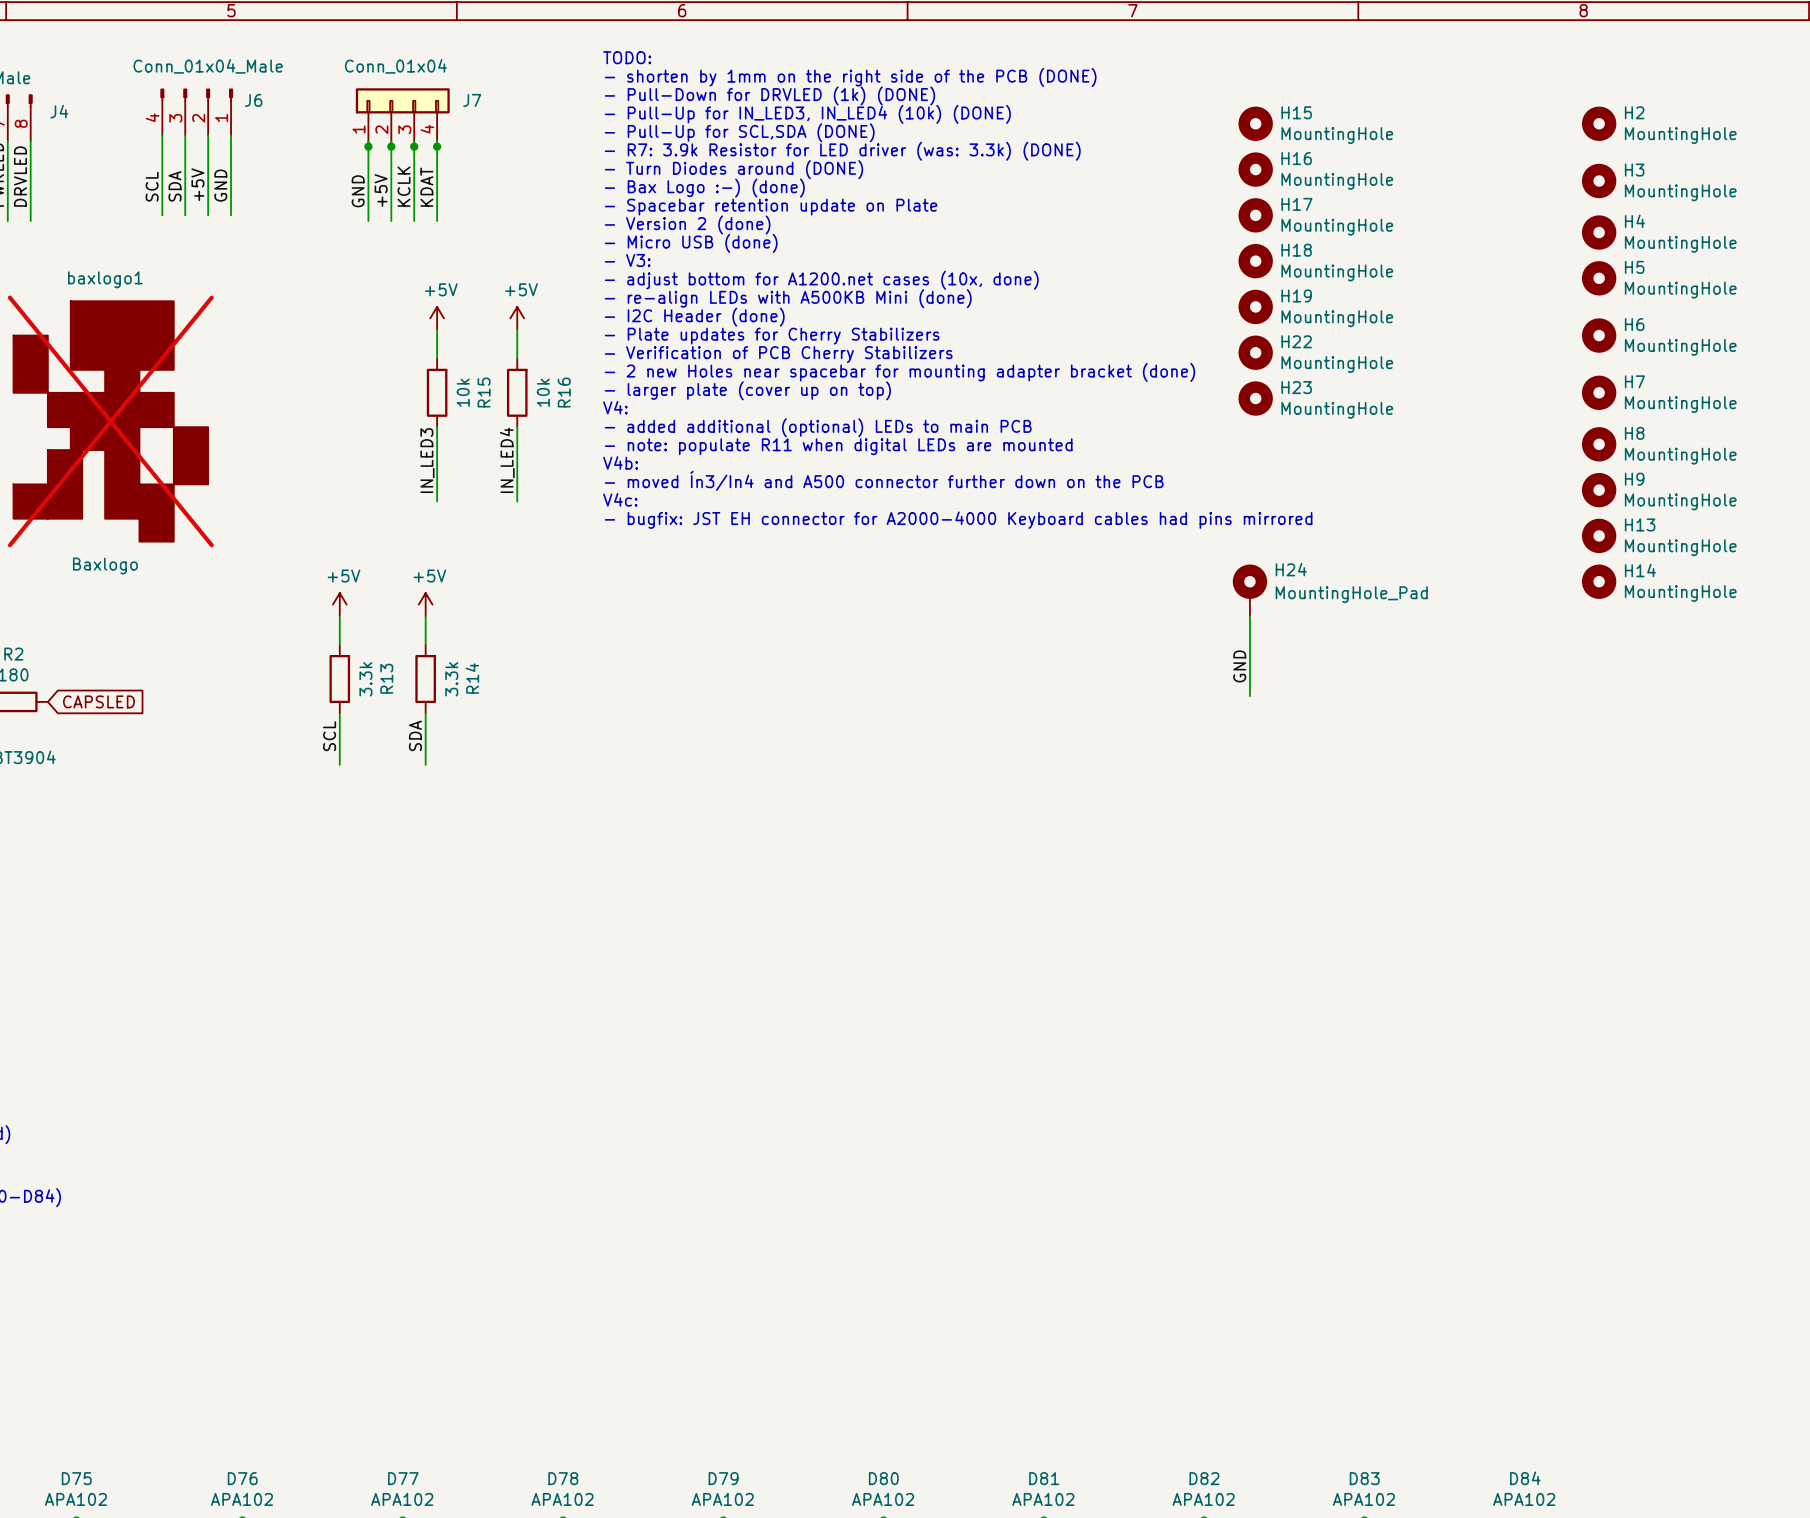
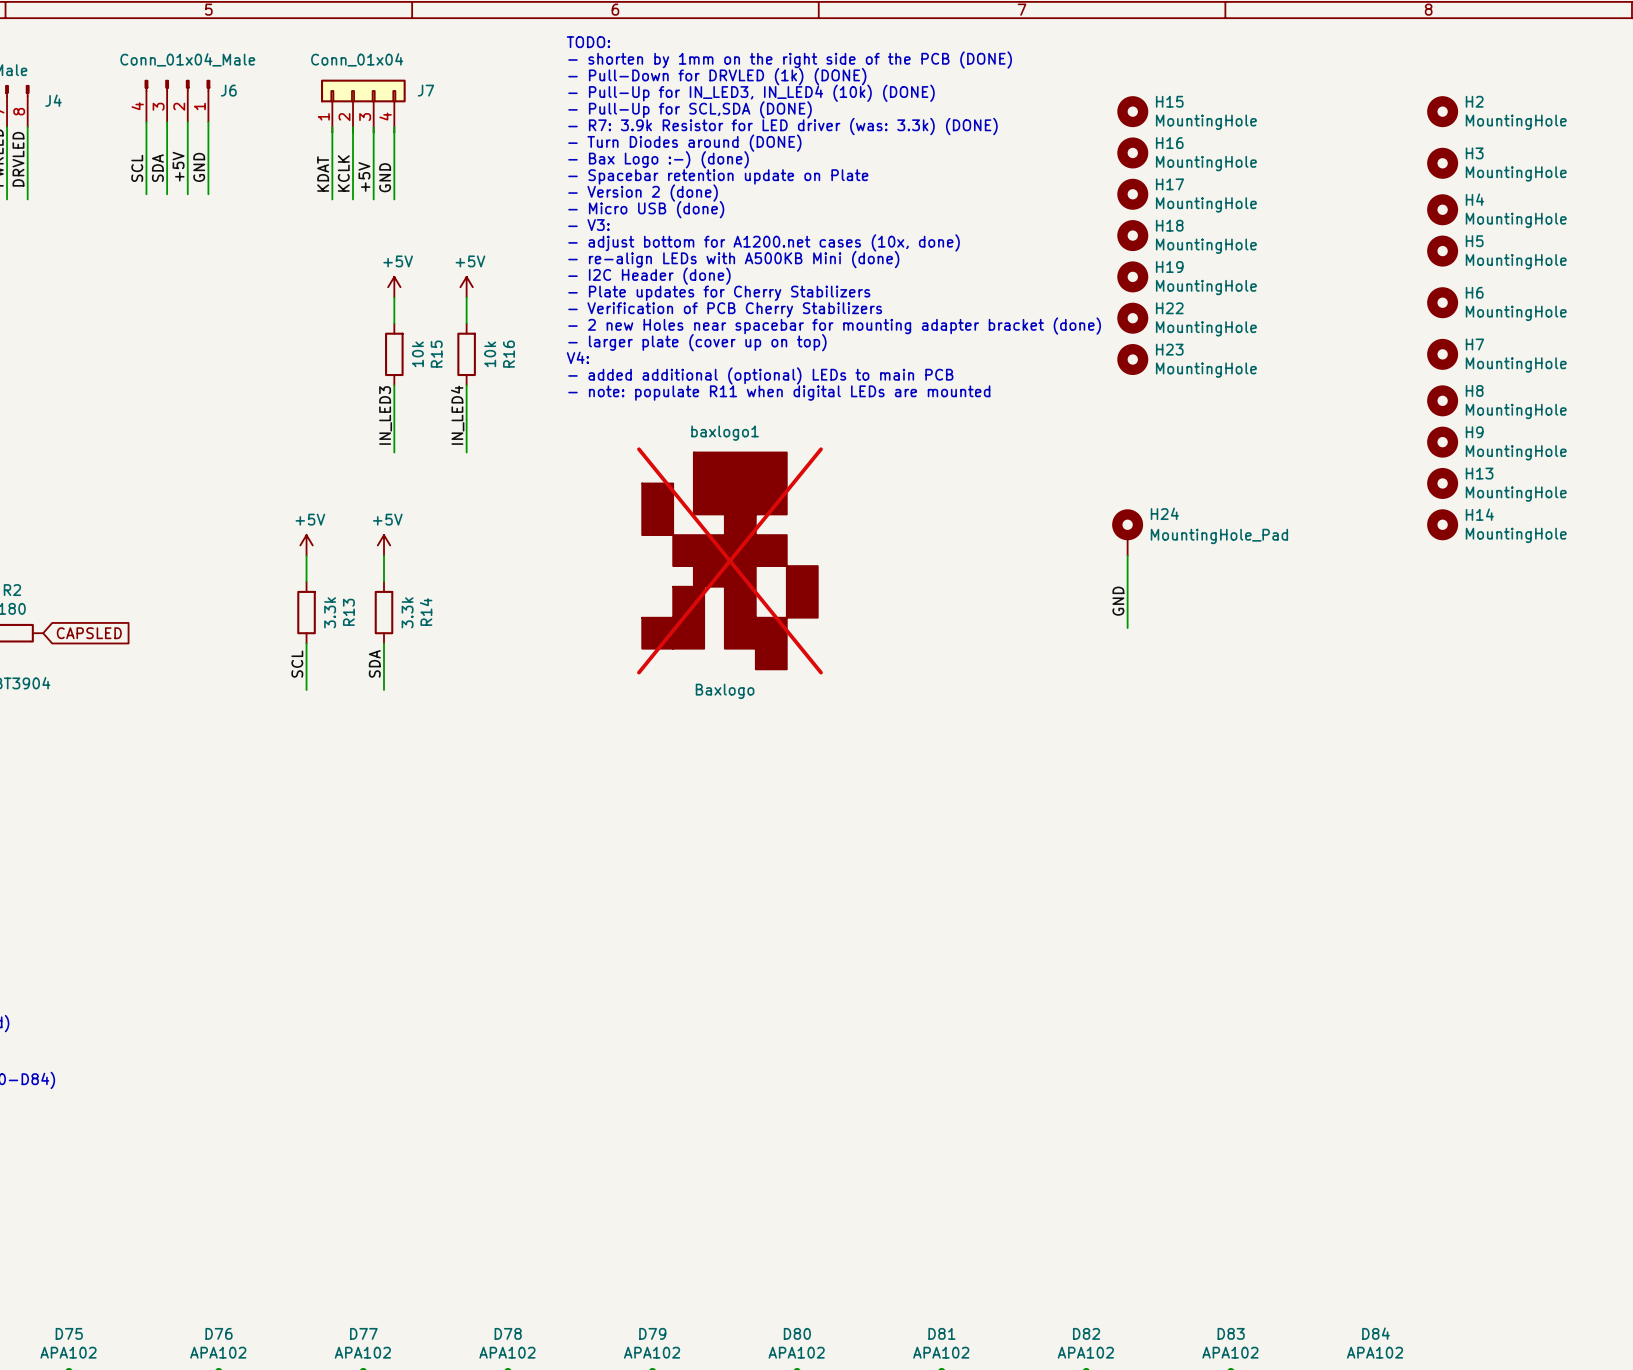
text position: TODO: (627, 57) -> TODO: (588, 42)
text position: - shorten by 1mm on the right side of the PCB (DONE) (850, 77) -> - shorten by 1mm on the right side of the PCB (DONE) (790, 60)
text position: - Pull-Down for DRVLED (1k) (DONE) (769, 95) -> - Pull-Down for DRVLED (1k) (DONE) (717, 76)
text position: - Pull-Up for IN_LED3, IN_LED4 (10k) (DONE) (807, 114) -> - Pull-Up for IN_LED3, IN_LED4 (10k) (DONE) (751, 93)
text position: - Pull-Up for SCL,SDA (DONE) (739, 132) -> - Pull-Up for SCL,SDA (DONE) (690, 109)
junction: (368, 146) -> none
junction: (391, 146) -> none
junction: (414, 146) -> none
junction: (437, 146) -> none
text position: - R7: 3.9k Resistor for LED driver (was: 3.3k) (DONE) (842, 151) -> - R7: 3.9k Resistor for LED driver (was: 3.3k) (DONE) (782, 126)
text position: - Turn Diodes around (DONE) (733, 169) -> - Turn Diodes around (DONE) (684, 143)
label position: KCLK (403, 186) -> KCLK (343, 173)
label position: KDAT (426, 187) -> KDAT (323, 174)
text position: - Bax Logo :-) (done) (704, 188) -> - Bax Logo :-) (done) (658, 159)
label position: +5V (381, 190) -> +5V (364, 176)
label position: GND (358, 191) -> GND (385, 177)
text position: - Spacebar retention update on Plate (771, 207) -> - Spacebar retention update on Plate (718, 176)
text position: - Version 2 (done) (687, 224) -> - Version 2 (done) (643, 193)
text position: - Micro USB (done) (691, 243) -> - Micro USB (done) (646, 209)
text position: - V3: (627, 260) -> - V3: (588, 225)
text position: - adjust bottom for A1200.net cases (10x, done) (821, 280) -> - adjust bottom for A1200.net cases (10x, done) (764, 242)
text position: - re-align LEDs with A500KB Mini (done) (788, 298) -> - re-align LEDs with A500KB Mini (done) (733, 259)
text position: - I2C Header (done) (694, 317) -> - I2C Header (done) (649, 276)
text position: - Plate updates for Cherry Stabilizers (772, 336) -> - Plate updates for Cherry Stabilizers (719, 293)
text position: - Verification of PCB Cherry Stabilizers (778, 354) -> - Verification of PCB Cherry Stabilizers (725, 309)
text position: - 2 new Holes near spacebar for mounting adapter bracket (done) (899, 372) -> - 2 new Holes near spacebar for mounting adapter bracket (done) (834, 326)
text position: - larger plate (cover up on top) (747, 390) -> - larger plate (cover up on top) (697, 342)
text position: V4: (615, 407) -> V4: (577, 357)
baxlogo1 position: (110, 421) -> (729, 560)
text position: - added additional (optional) LEDs to main PCB (818, 427) -> - added additional (optional) LEDs to main PCB (760, 375)
text position: - note: populate R11 when digital LEDs are mounted (838, 446) -> - note: populate R11 when digital LEDs are mounted (779, 393)
text: V4b: (620, 462) -> none
text: - moved Ín3/In4 and A500 connector further down on the PCB (884, 480) -> none
text: V4c: (620, 499) -> none
text: - bugfix: JST EH connector for A2000-4000 Keyboard cables had pins mirrored (958, 520) -> none

